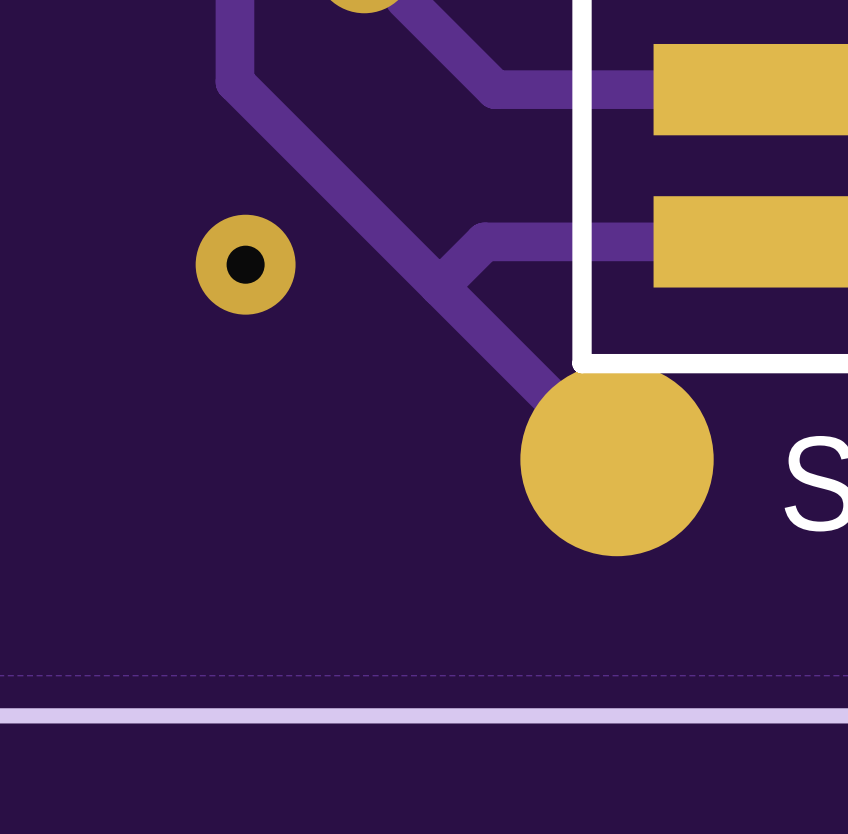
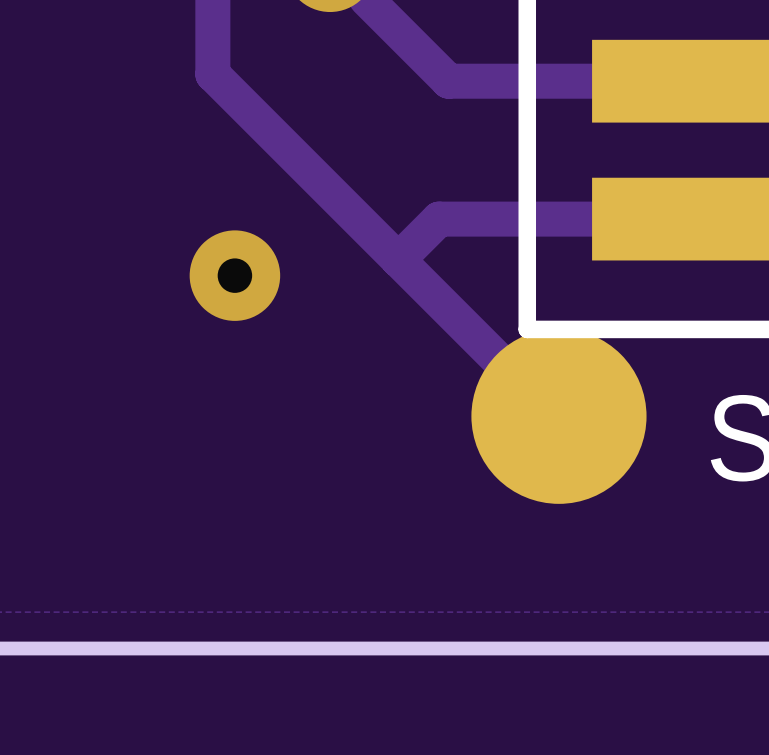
via position: (245, 264) -> (234, 275)

